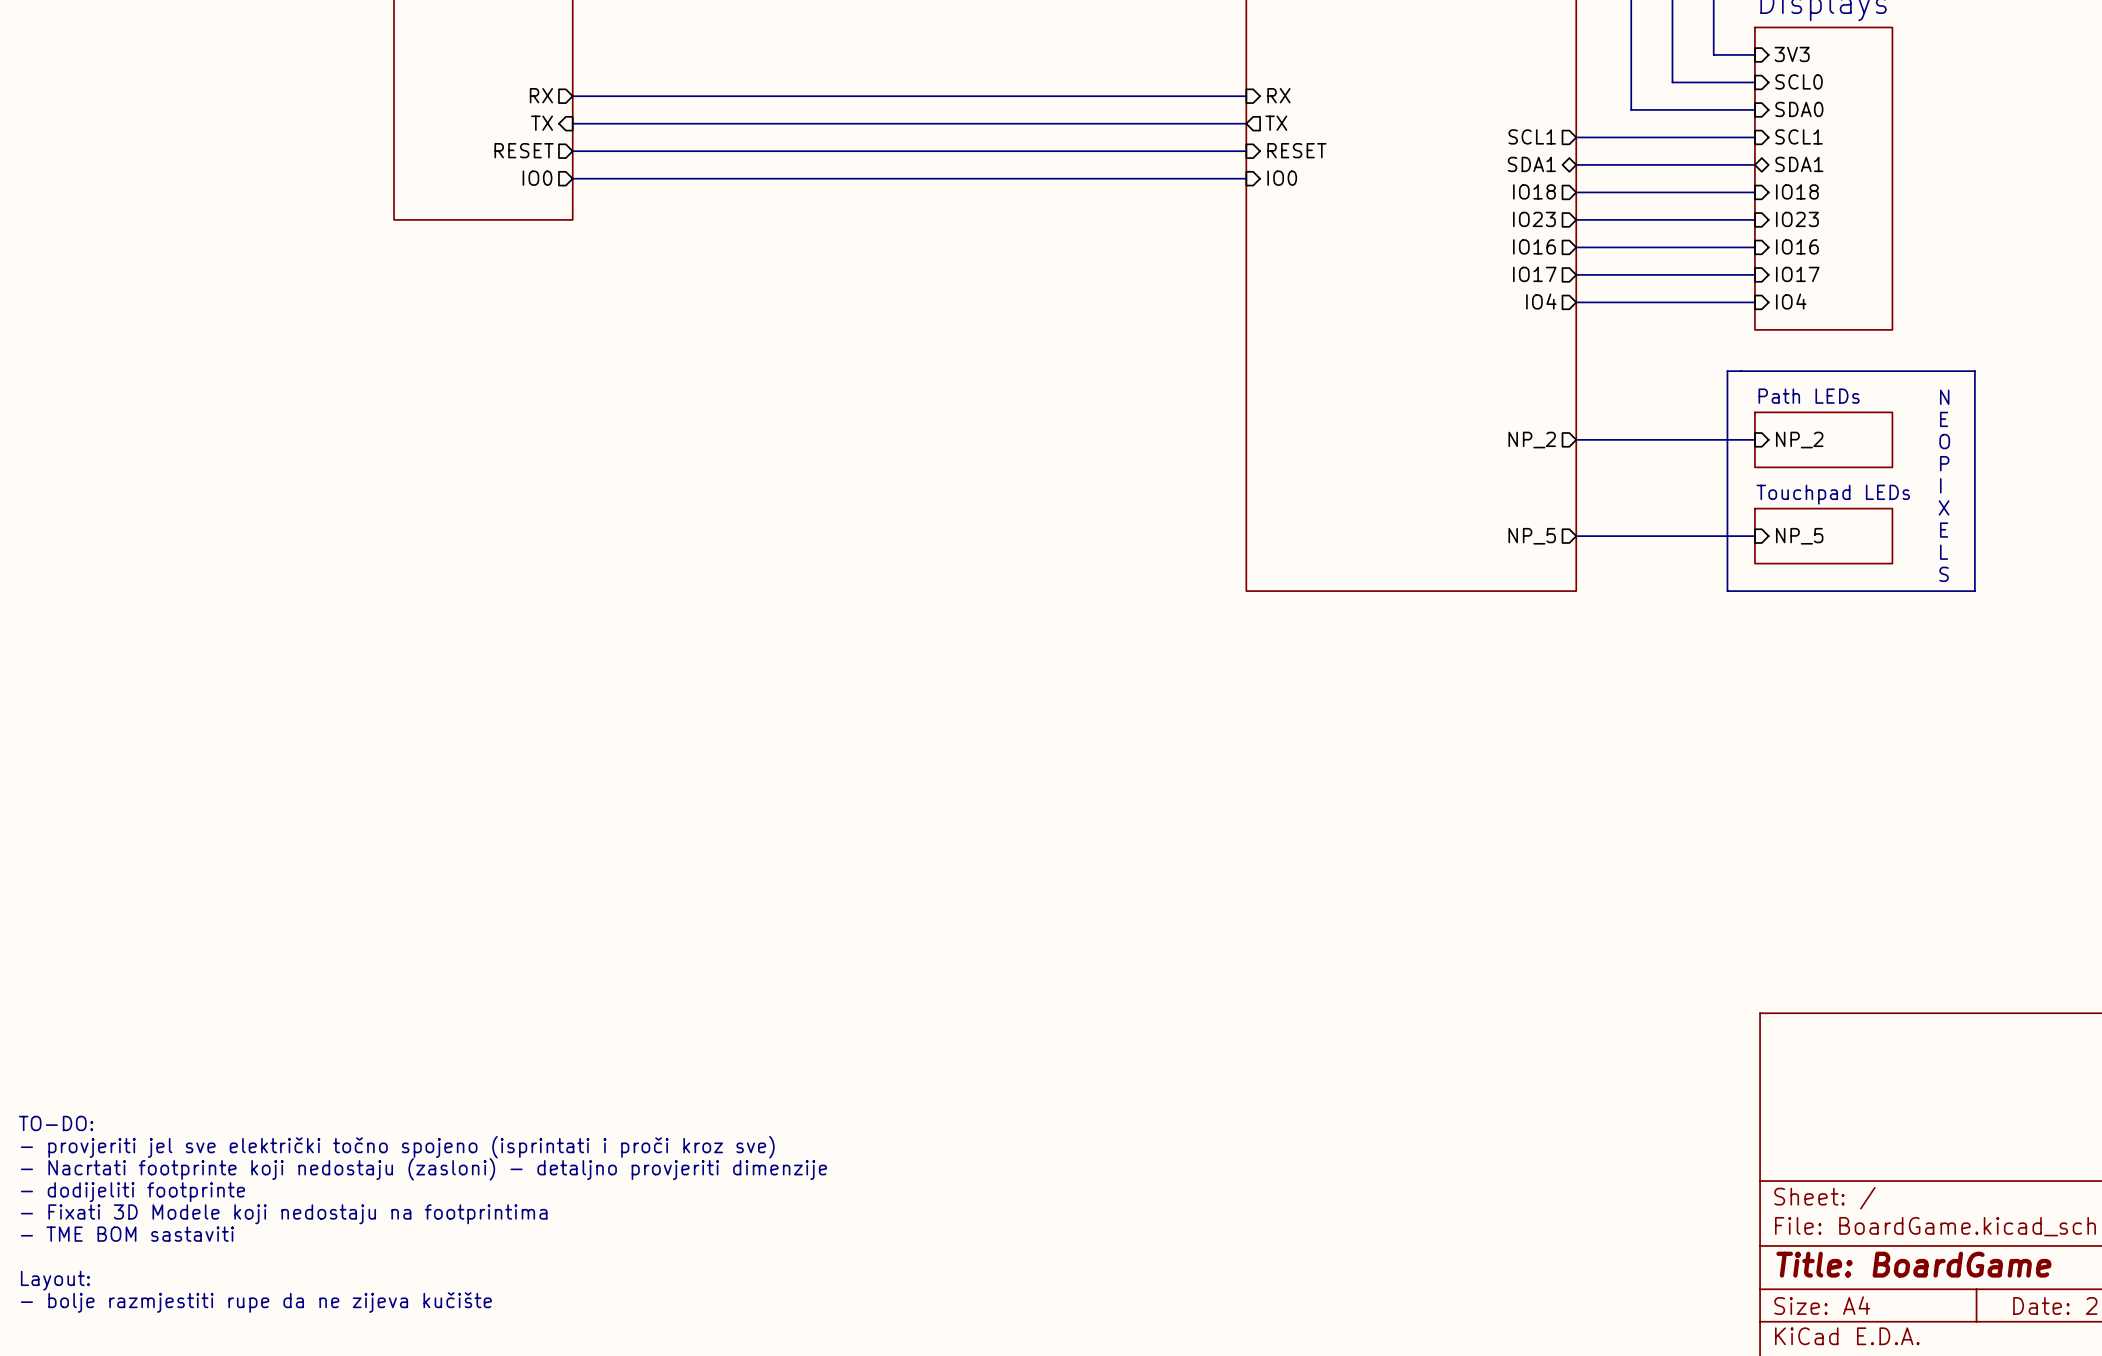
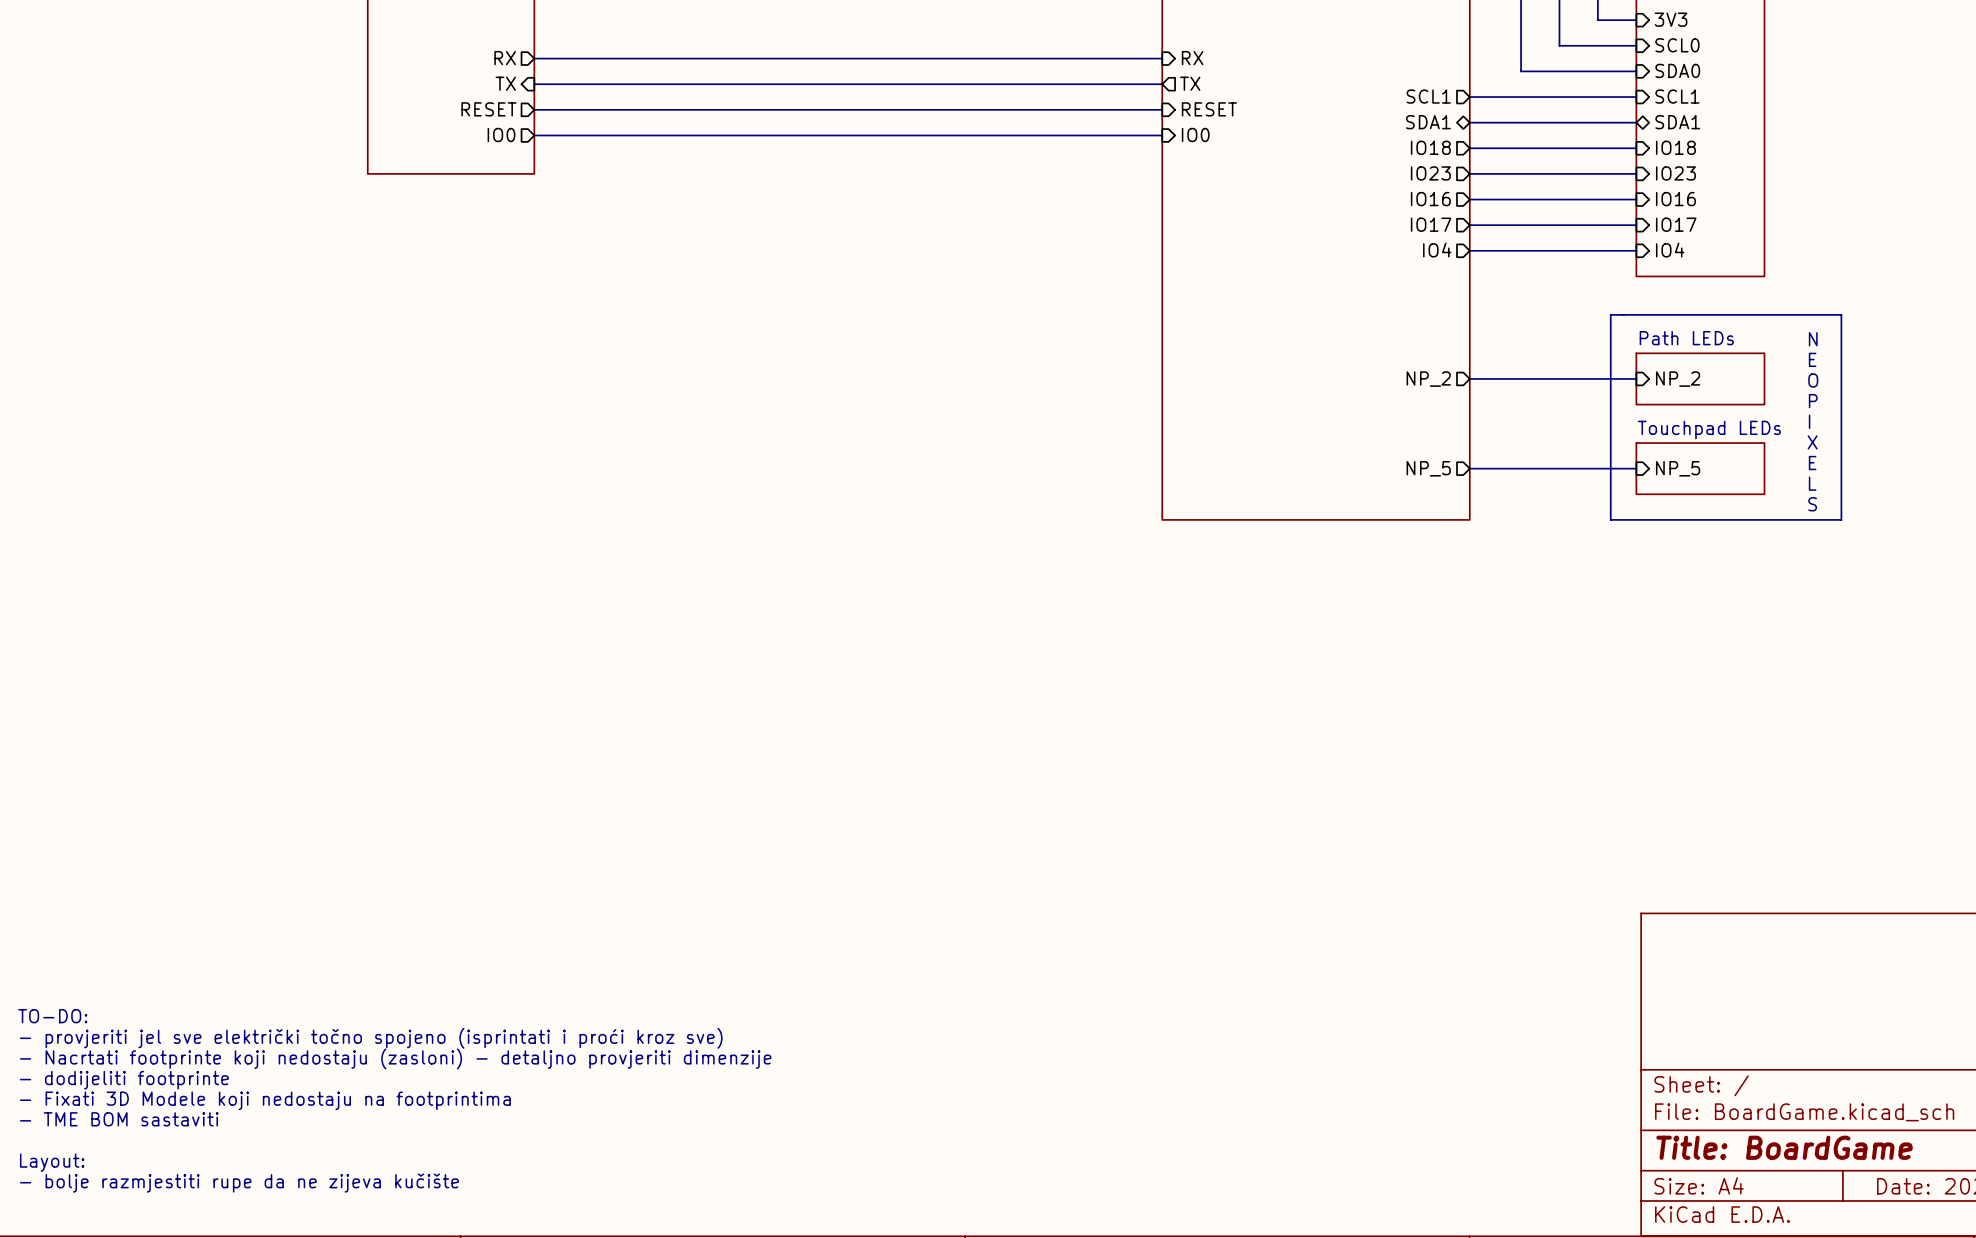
text: - provjeriti jel sve električki točno spojeno (isprintati i proči kroz sve) (397, 1147) -> - provjeriti jel sve električki točno spojeno (isprintati i proći kroz sve) (371, 1038)

